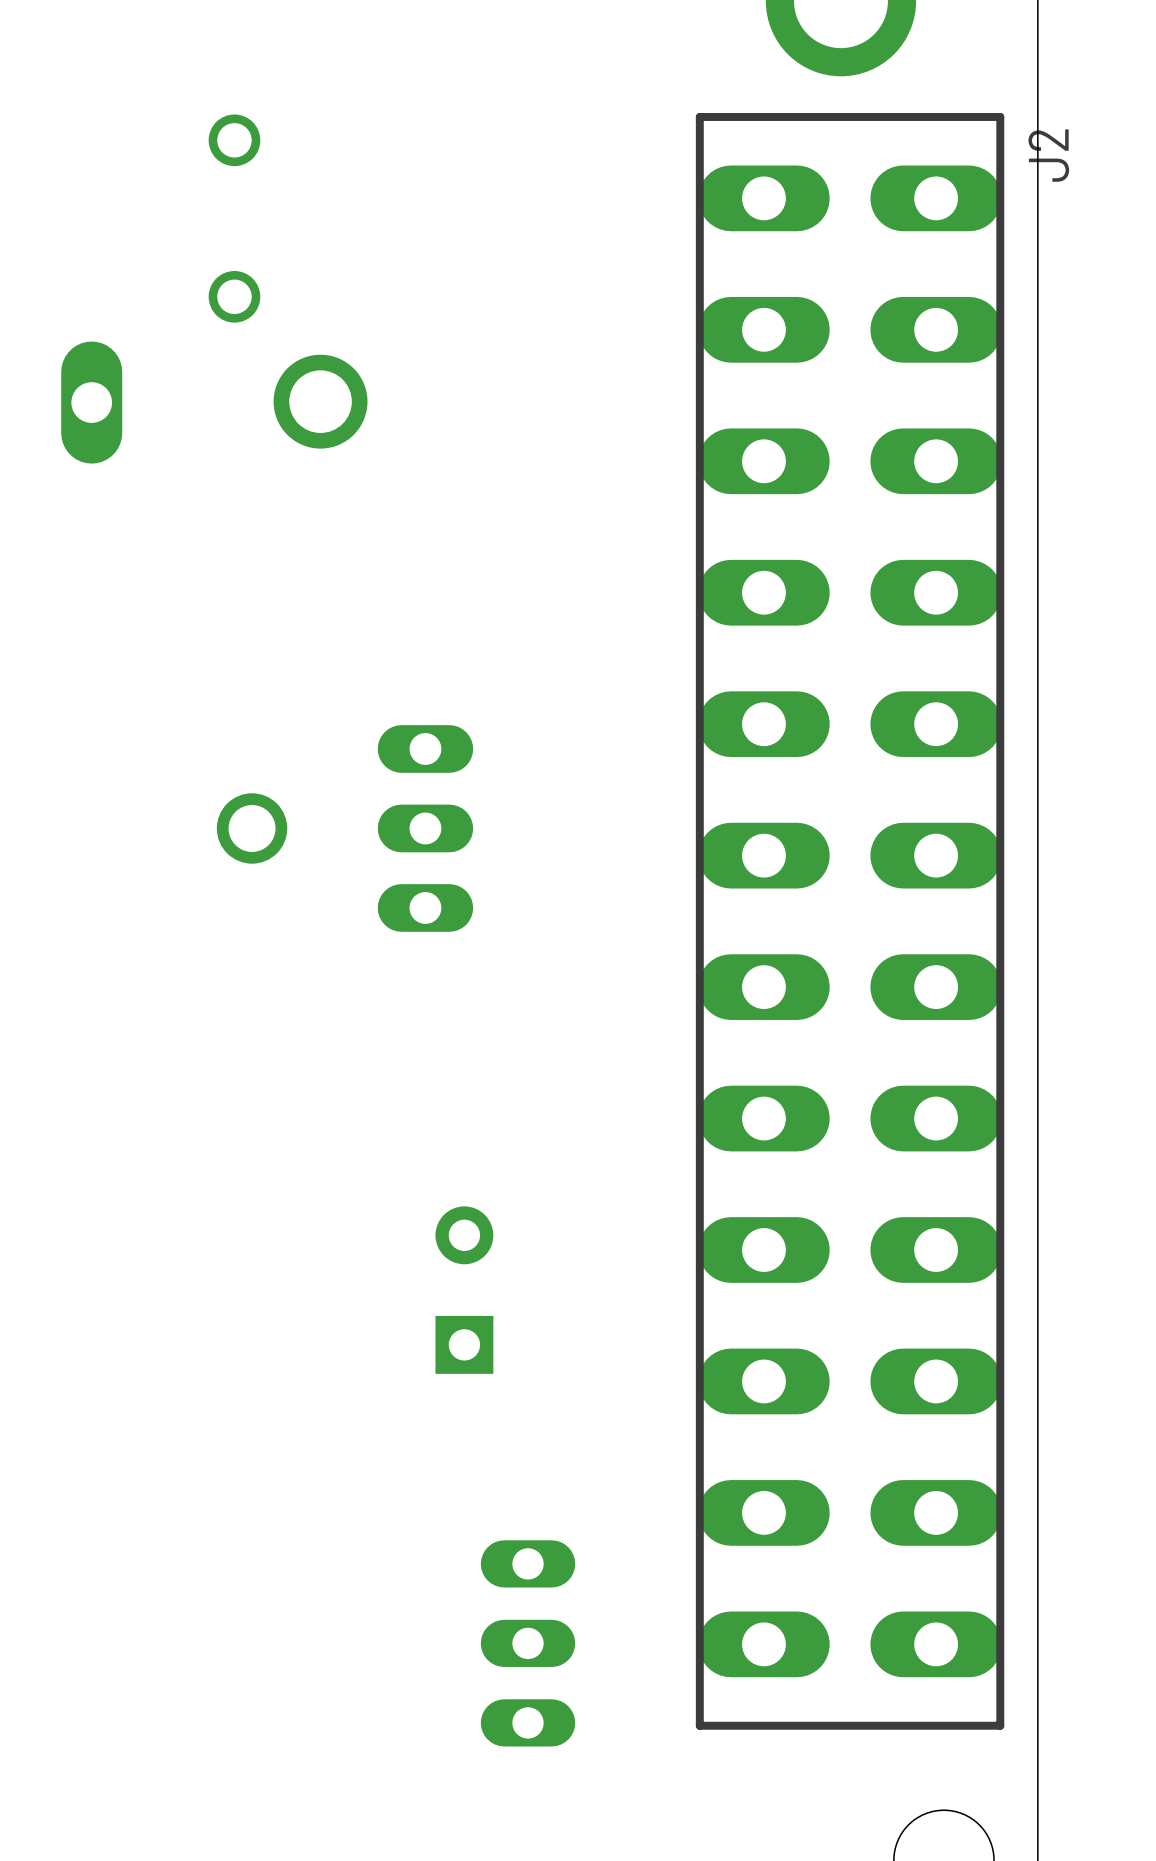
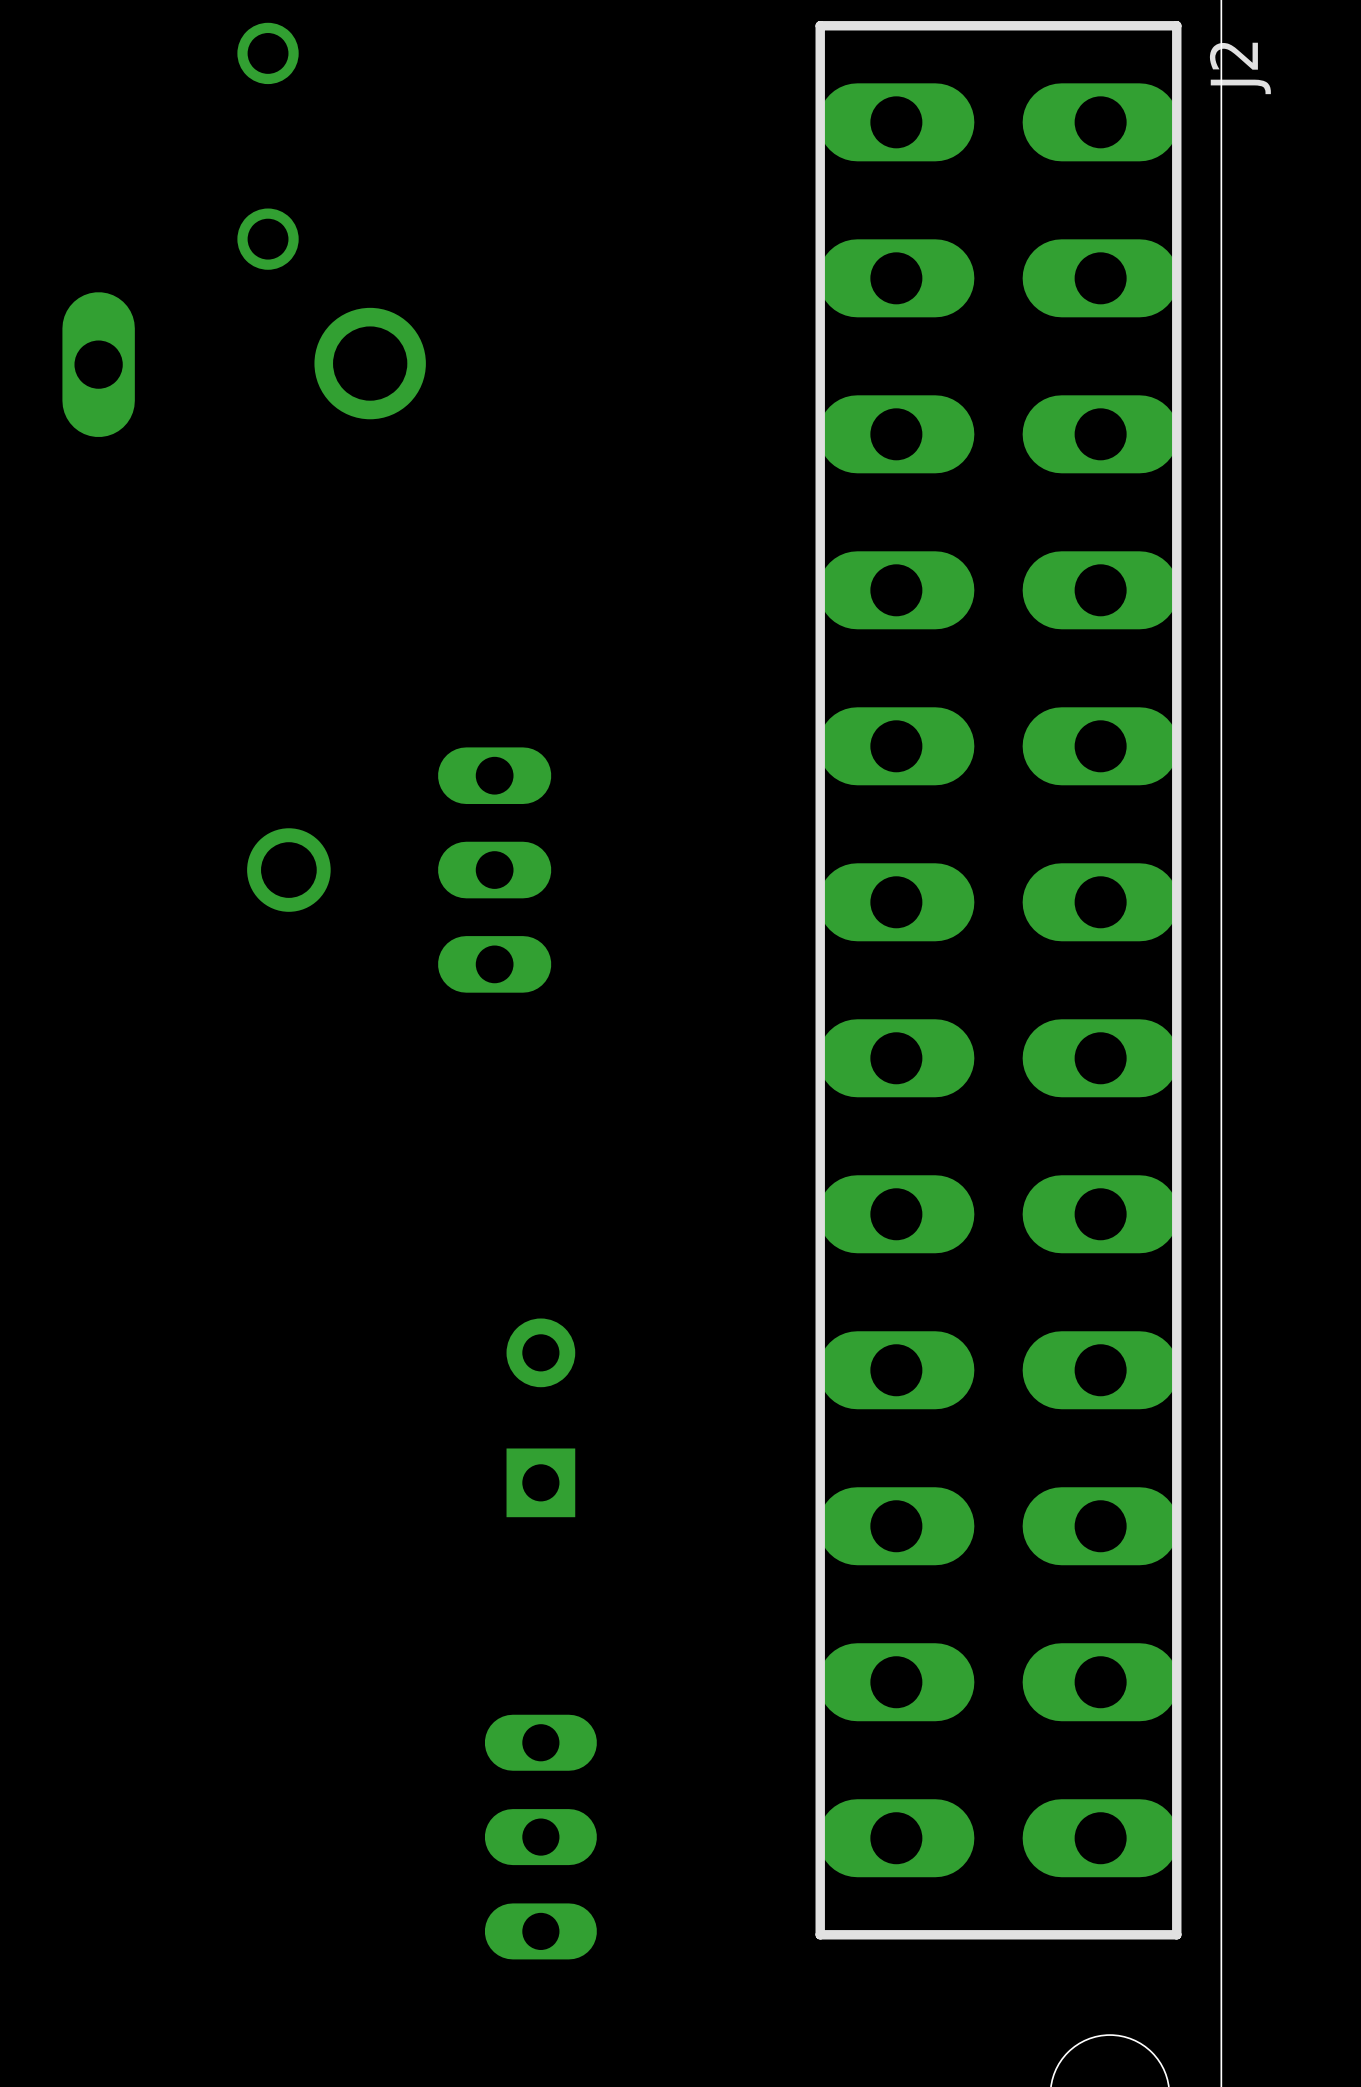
part position: (528, 1643) -> (540, 1837)

